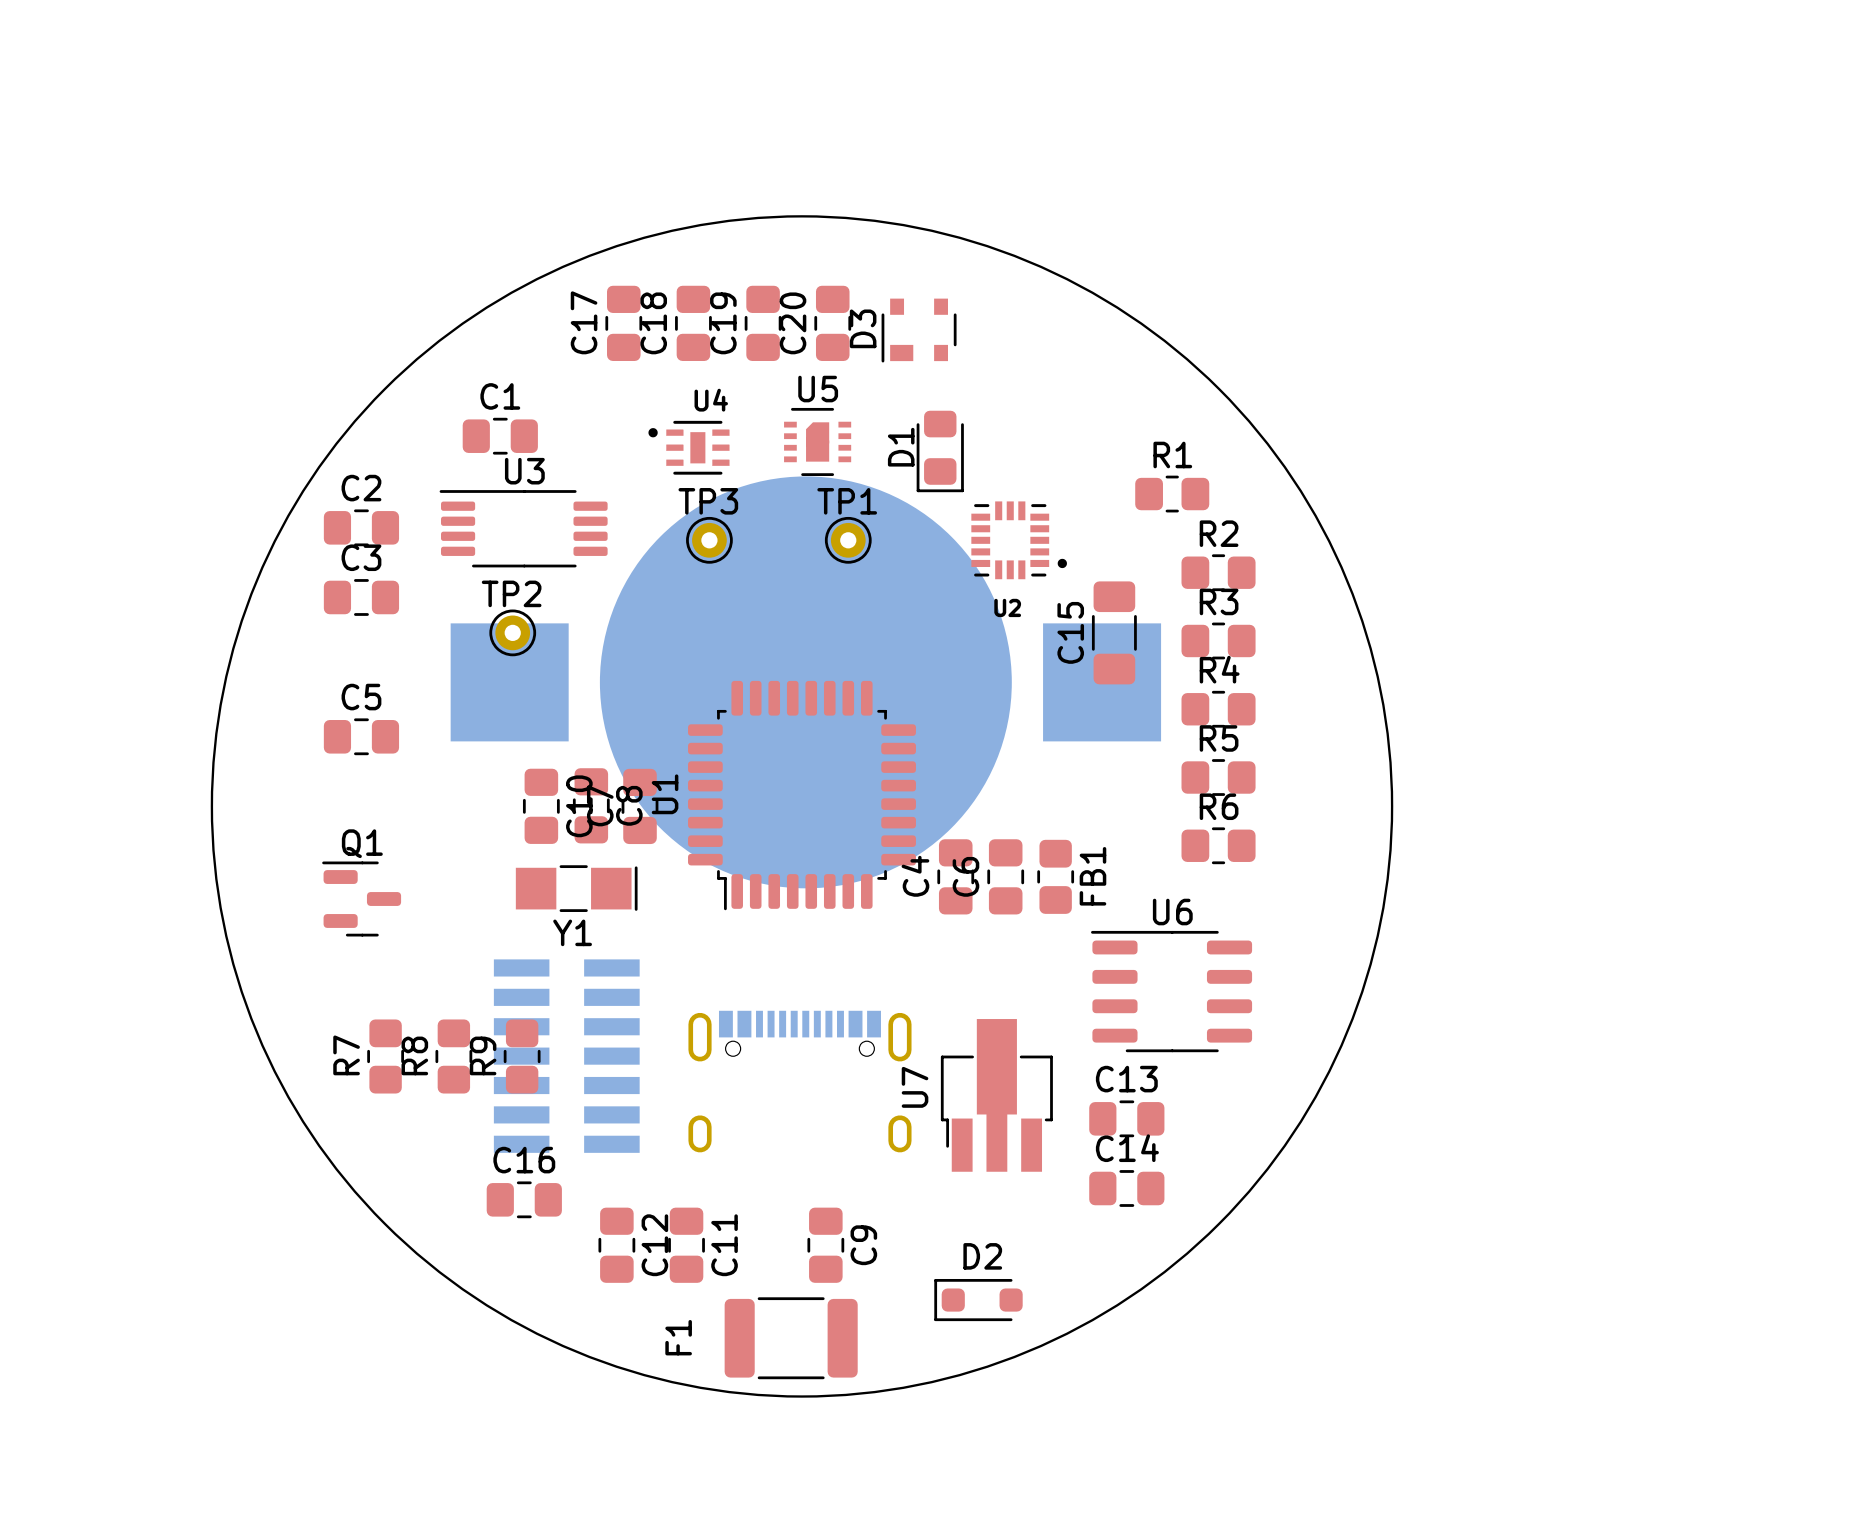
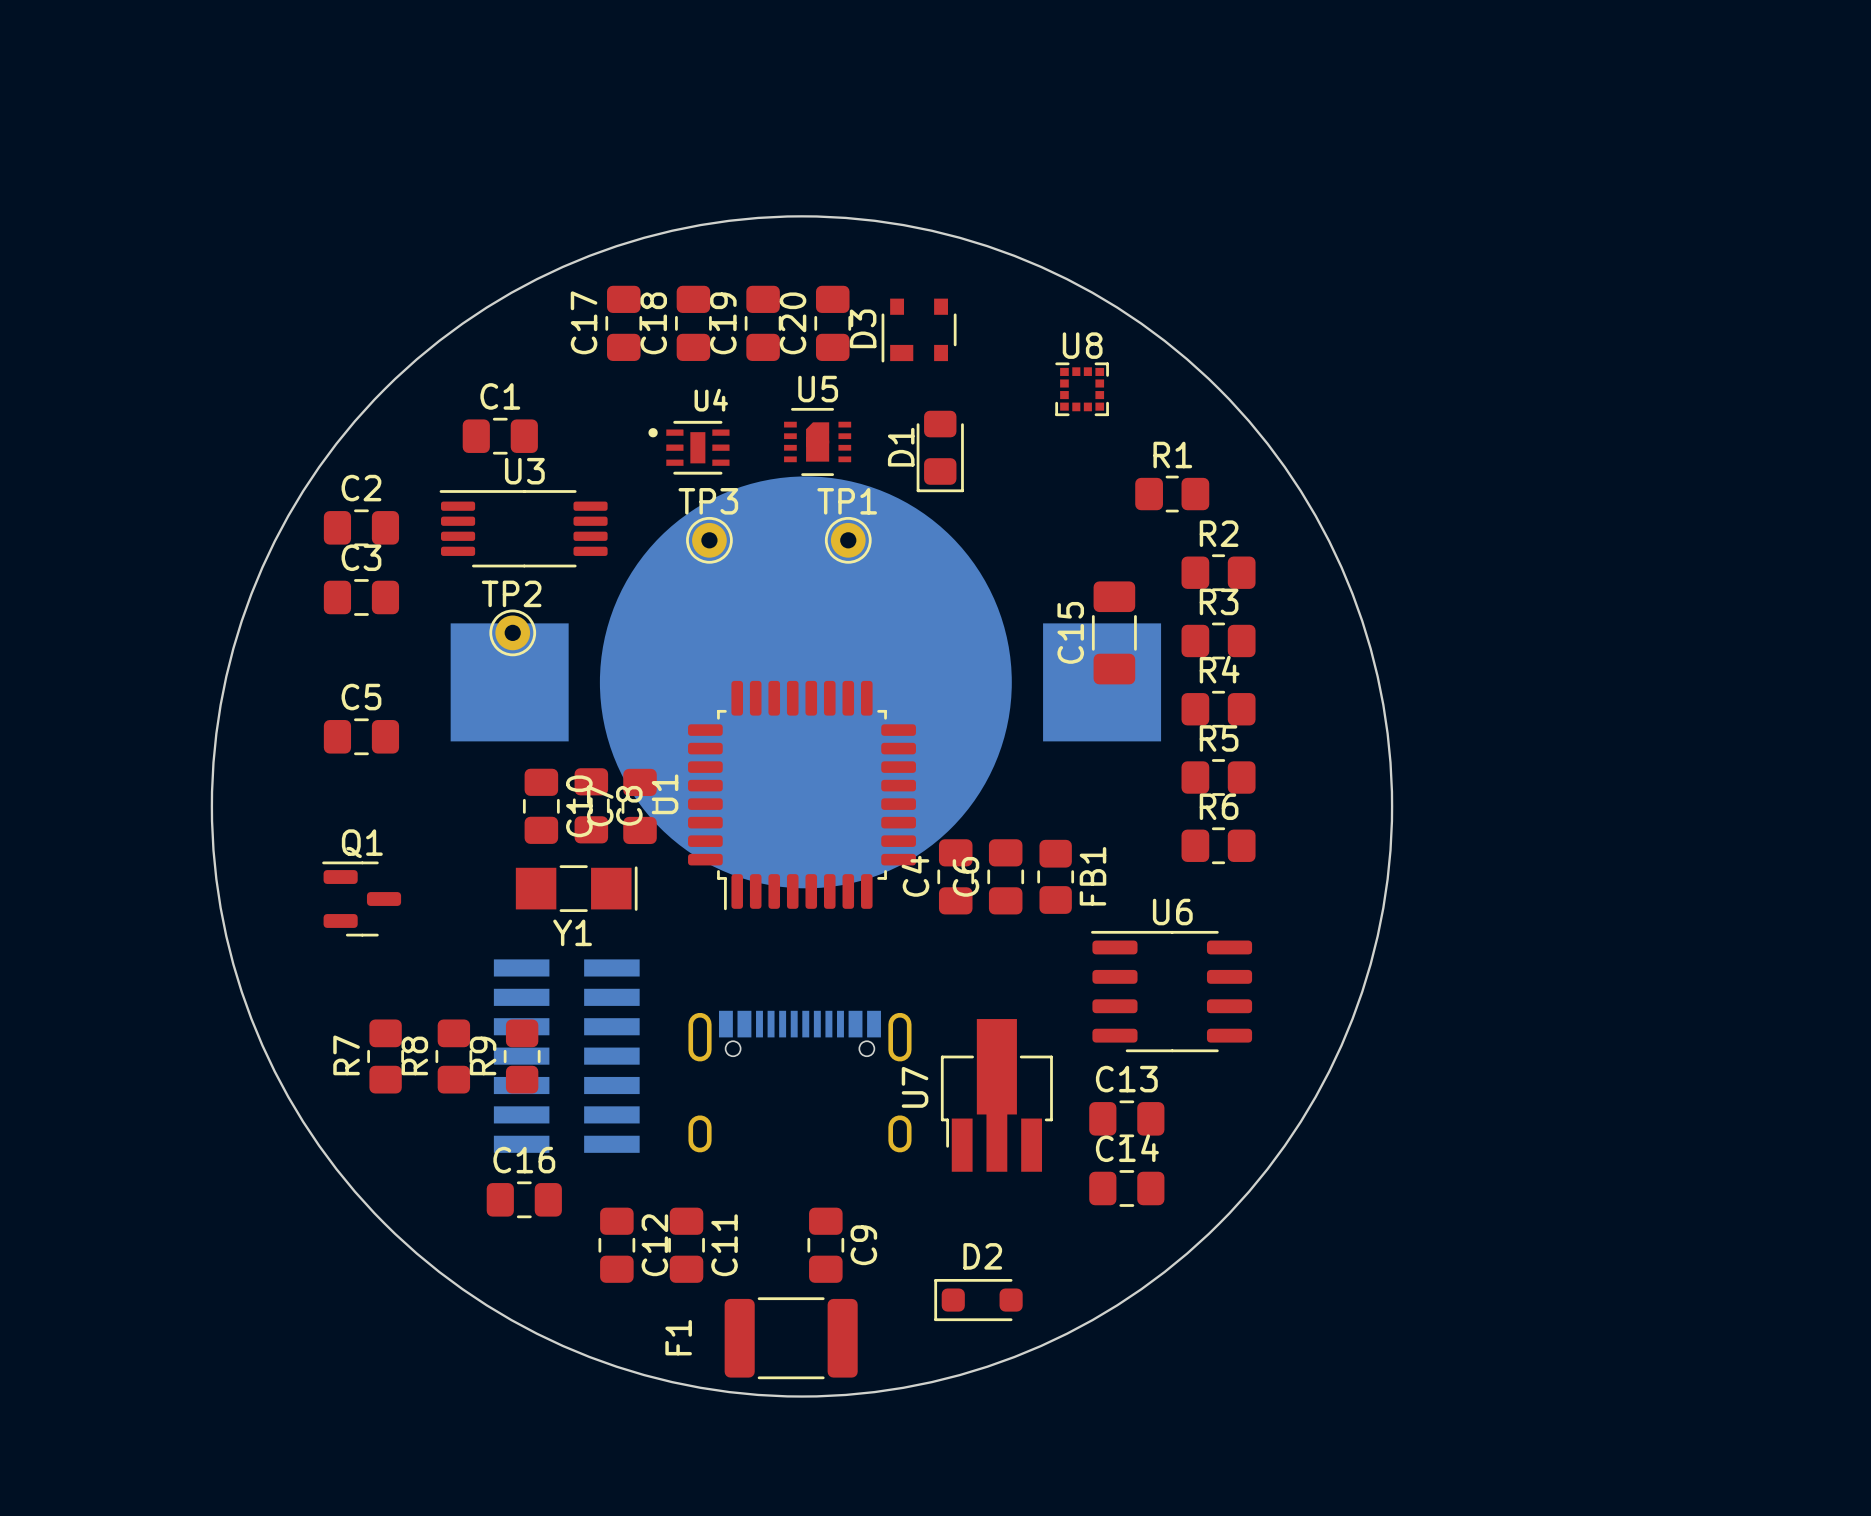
U8: none -> (1082, 389)
U2: (1019, 540) -> none

